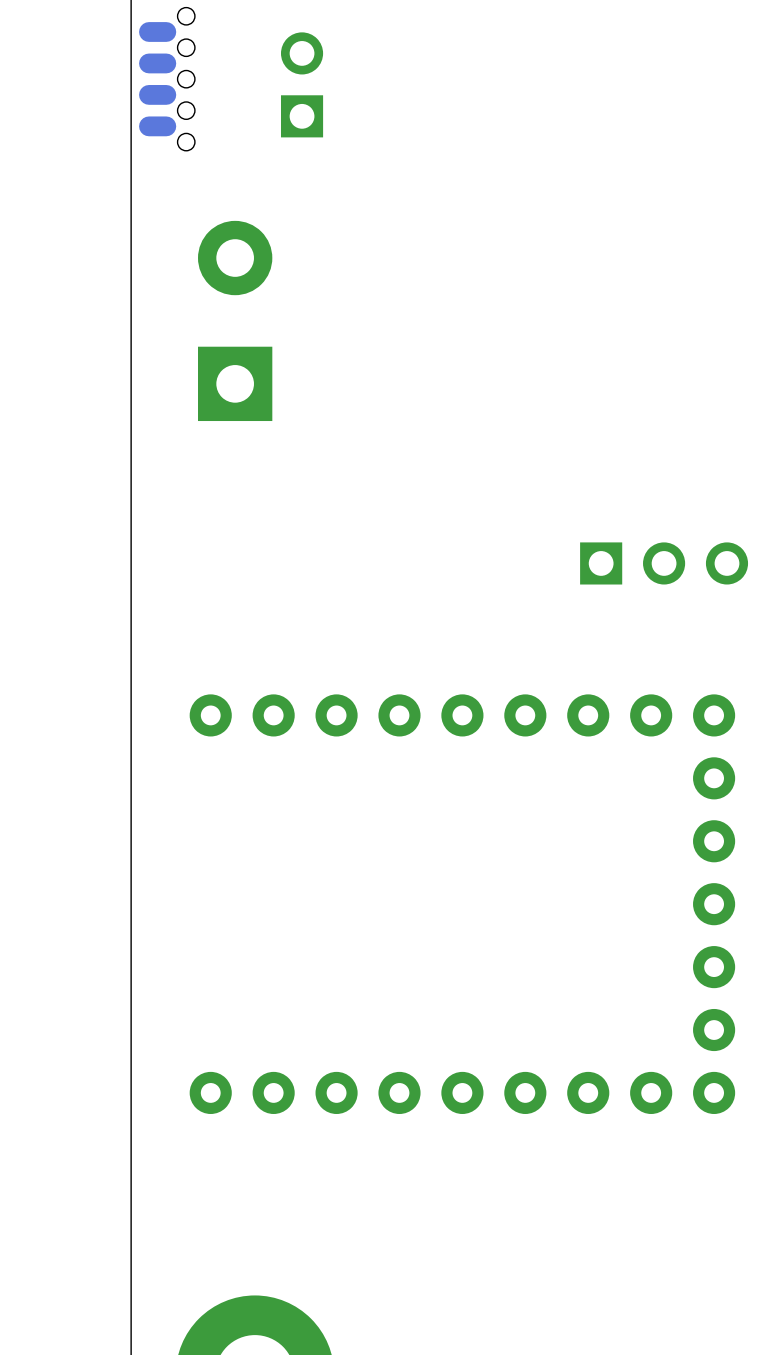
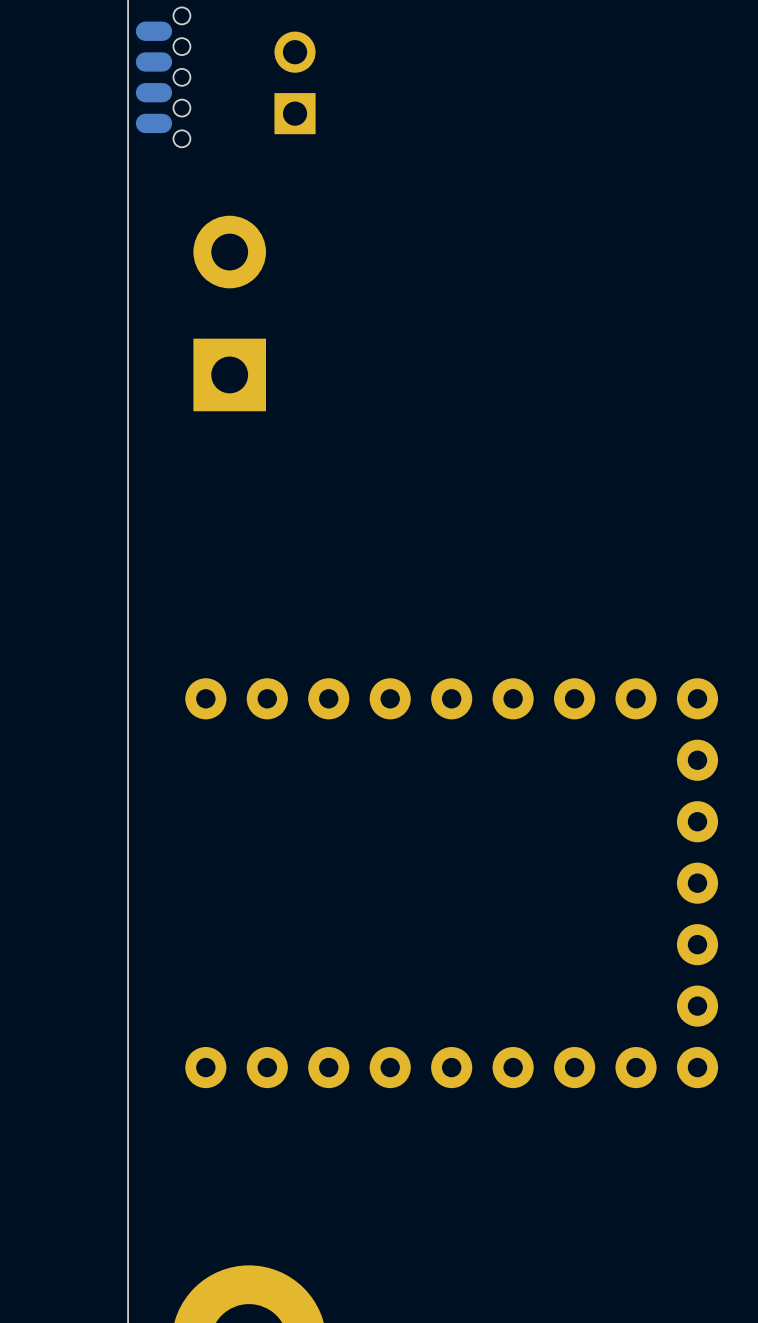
part: (664, 563) -> none

